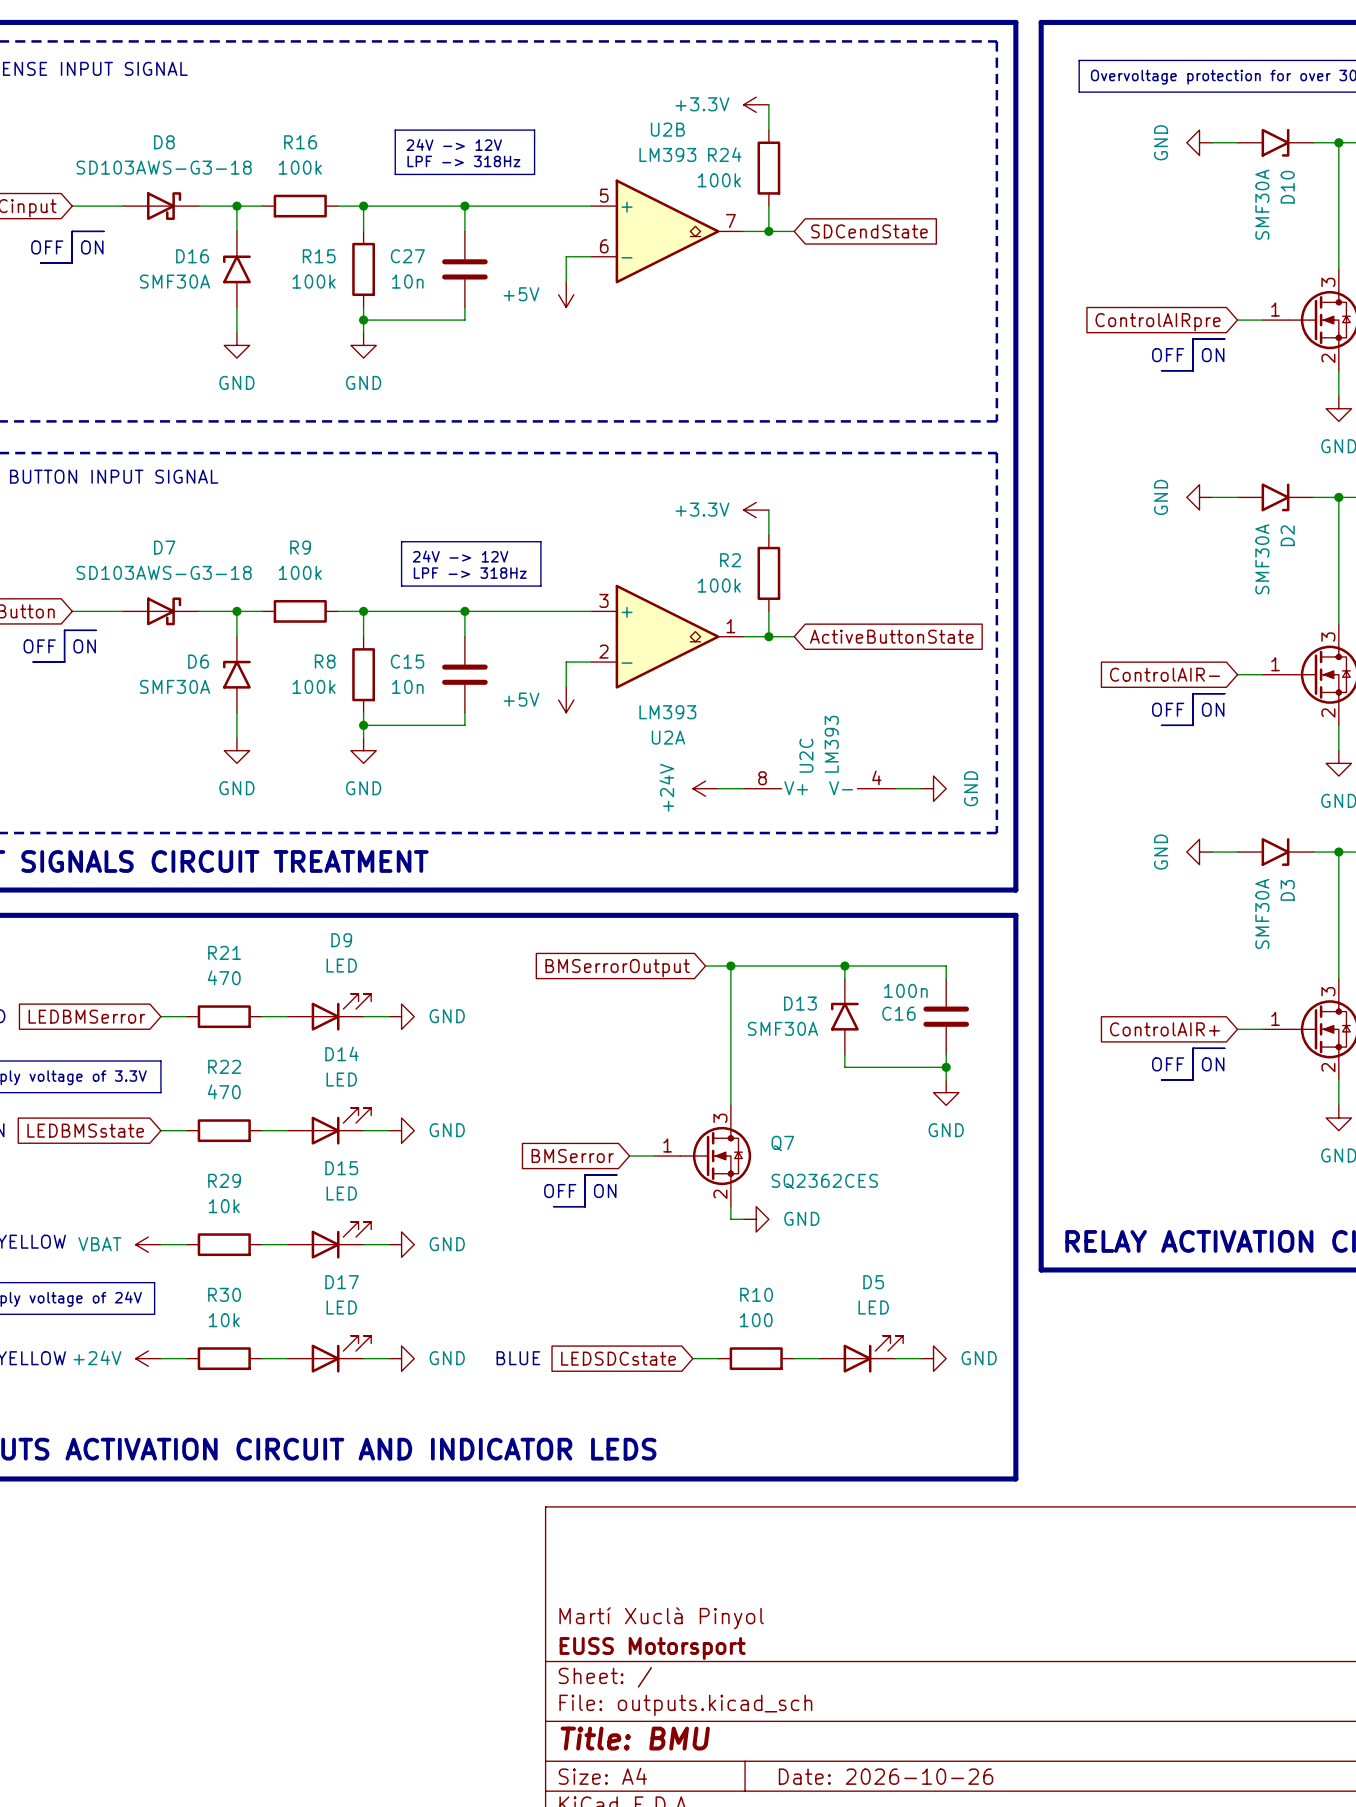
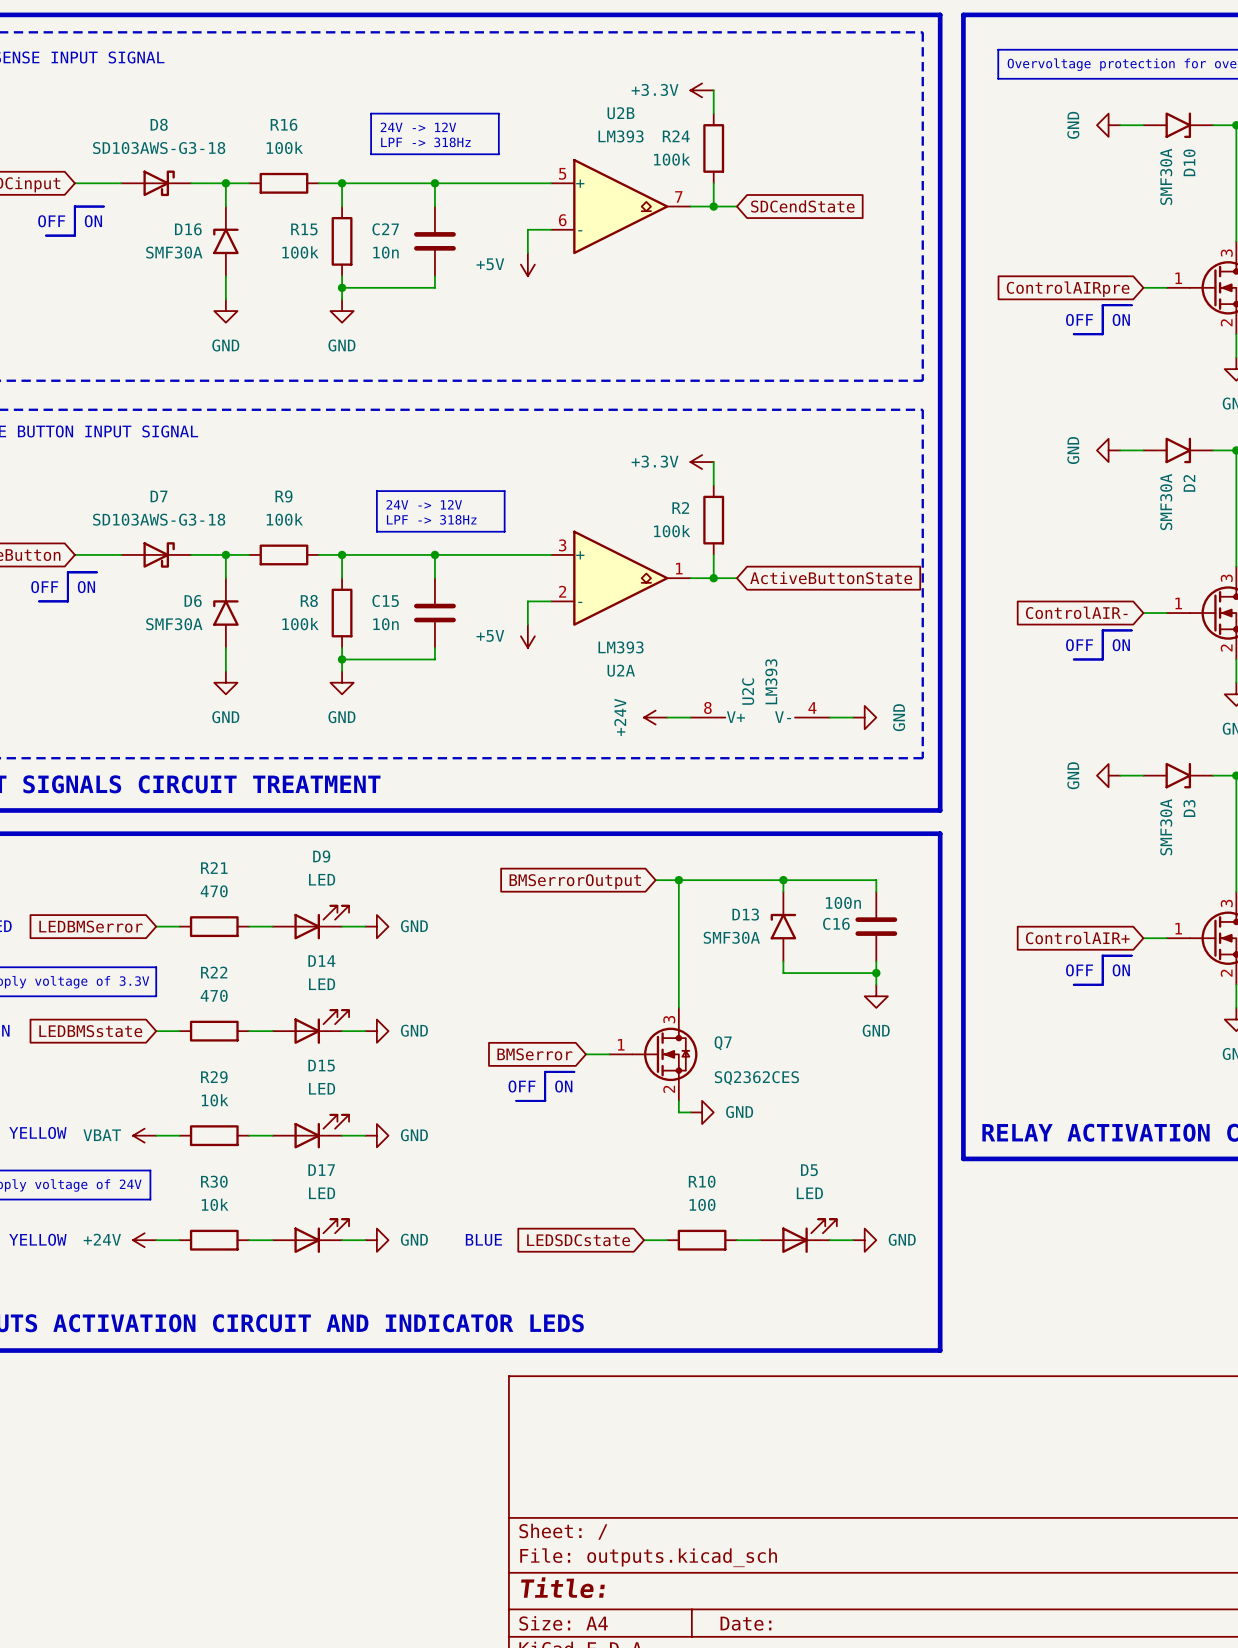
title block: Martí Xuclà Pinyol (661, 1618) -> none
title block: EUSS Motorsport (652, 1648) -> none
title block: Title: BMU (635, 1738) -> Title: (562, 1587)
title block: Date: 2026-10-26 (886, 1776) -> Date: (745, 1623)

